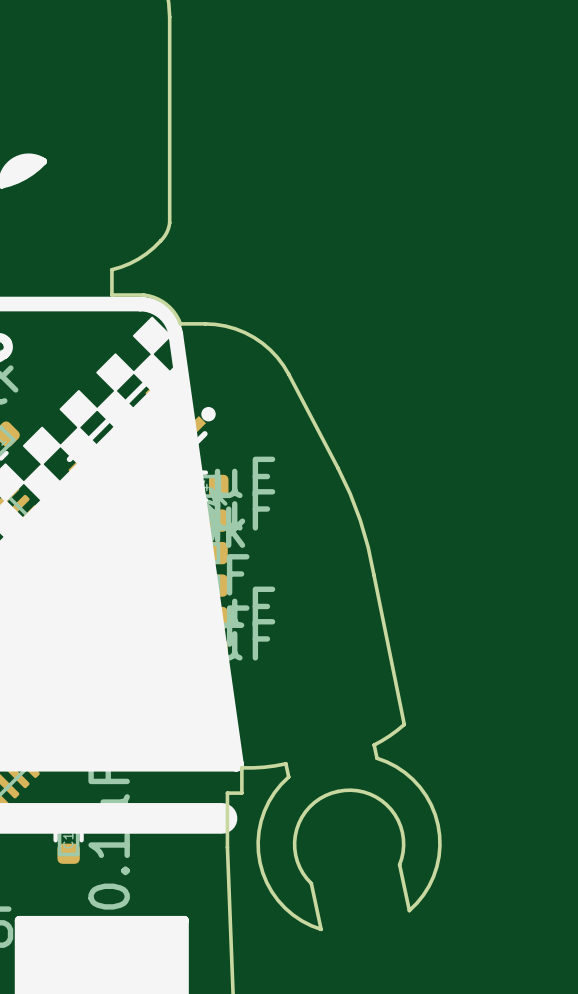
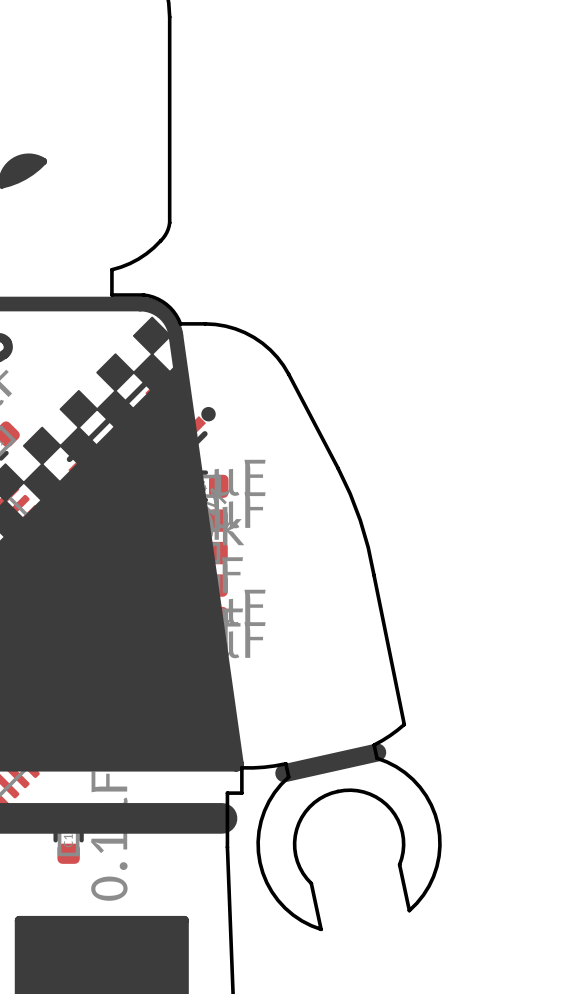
line: none -> (377, 752) (284, 773)

